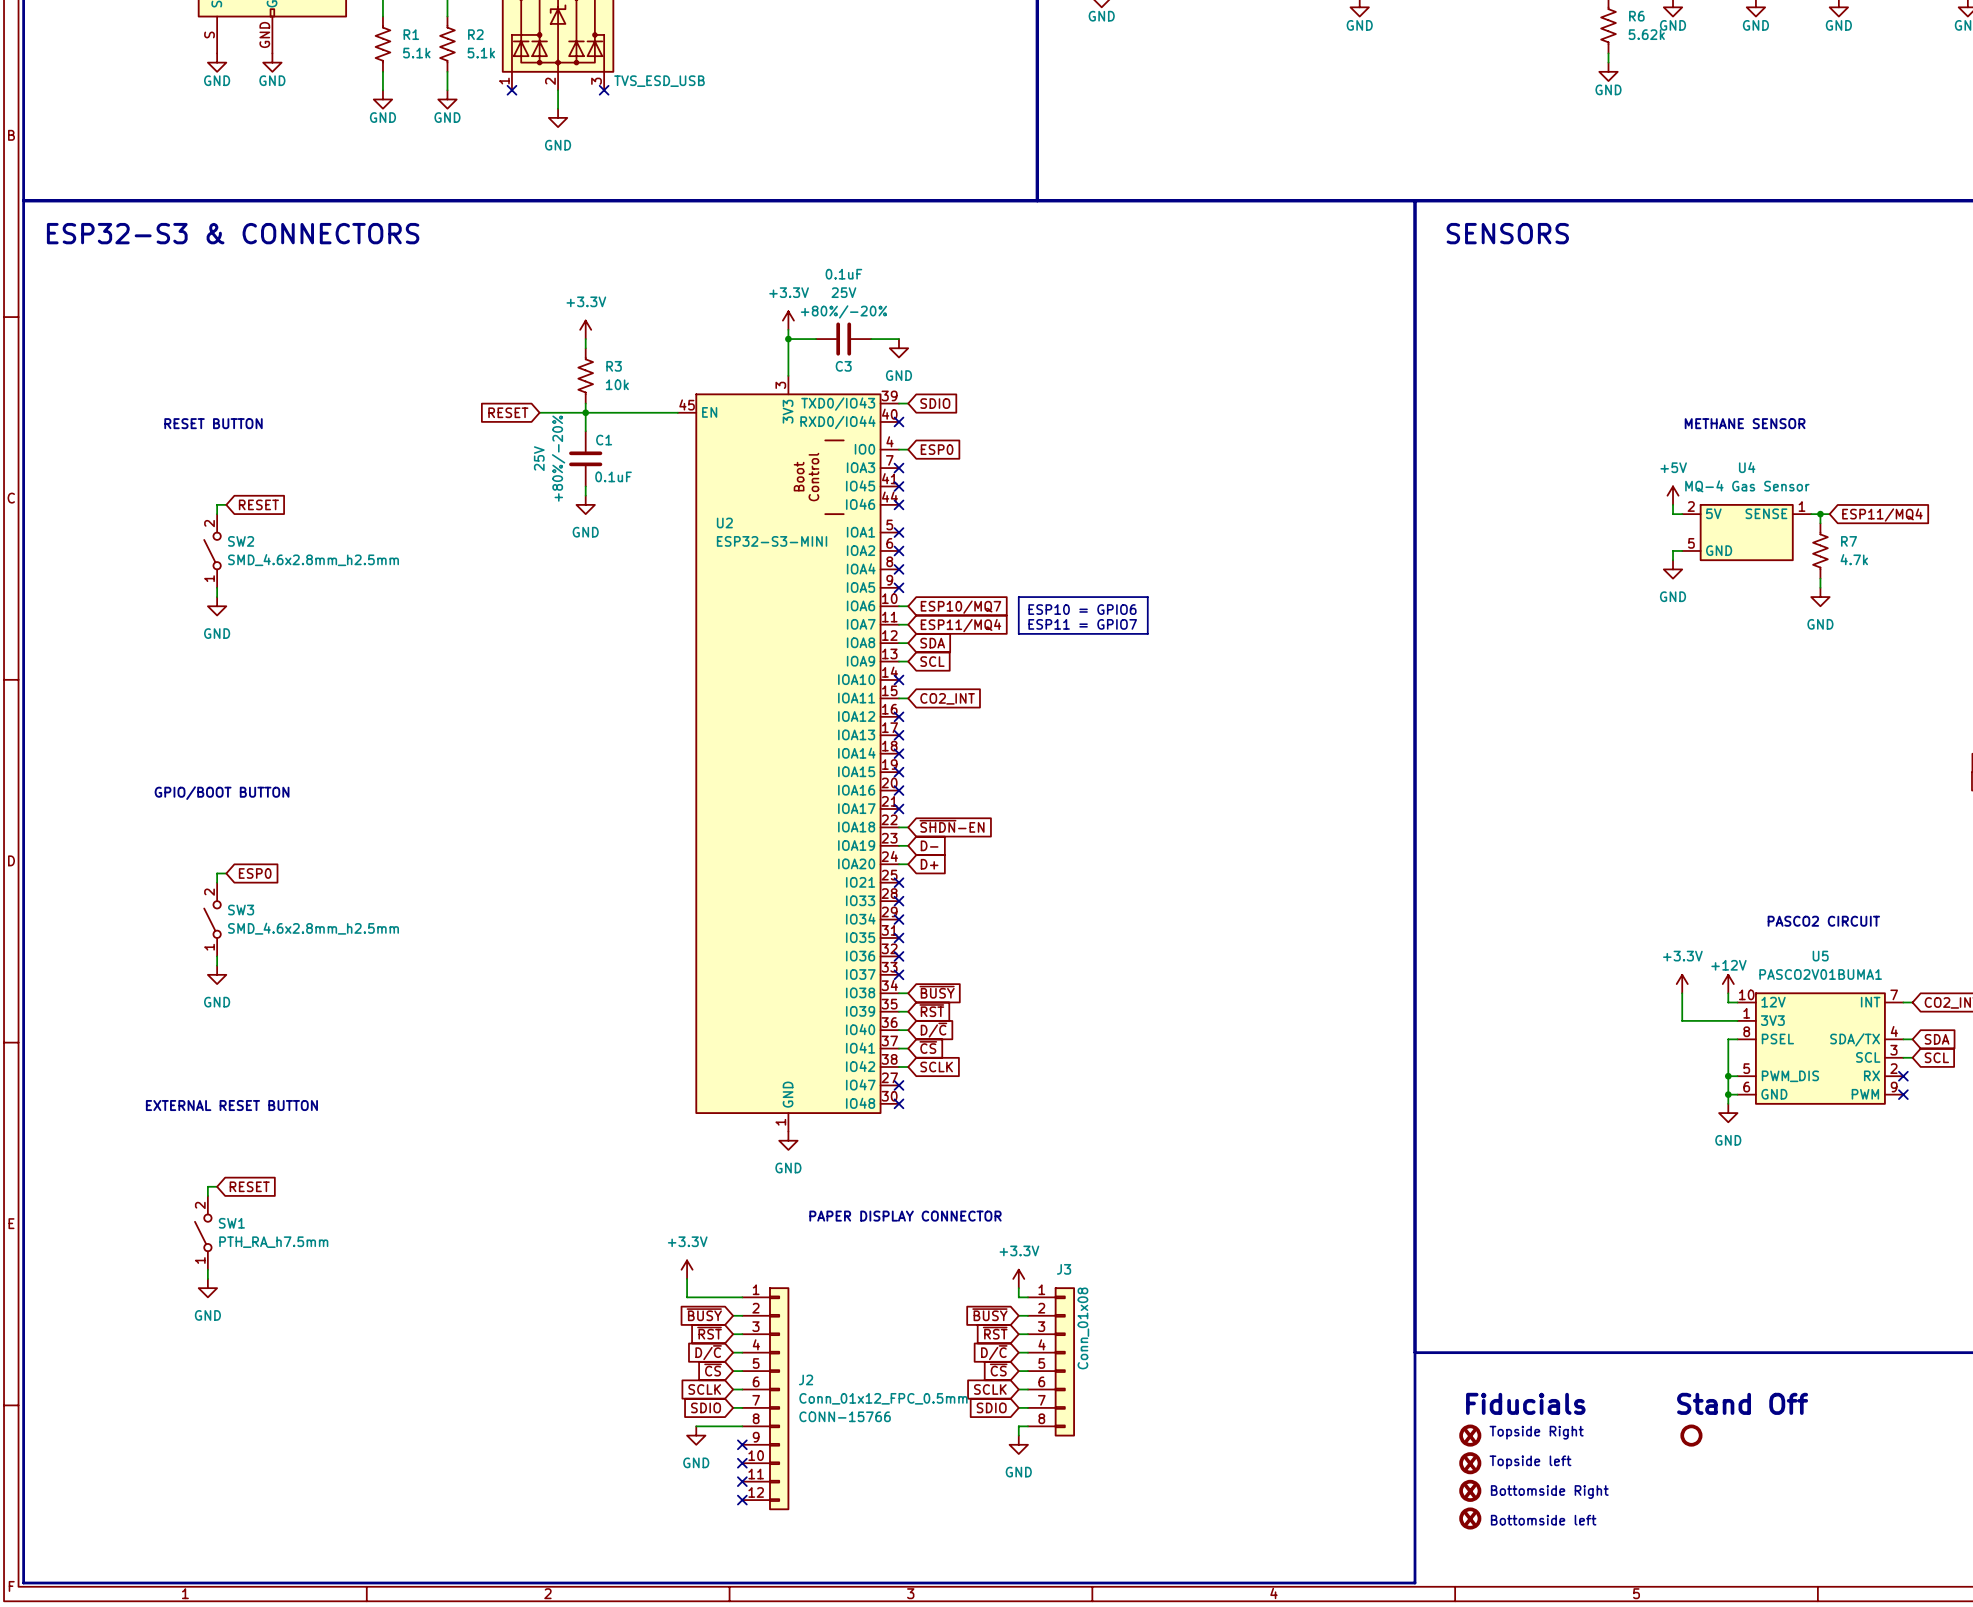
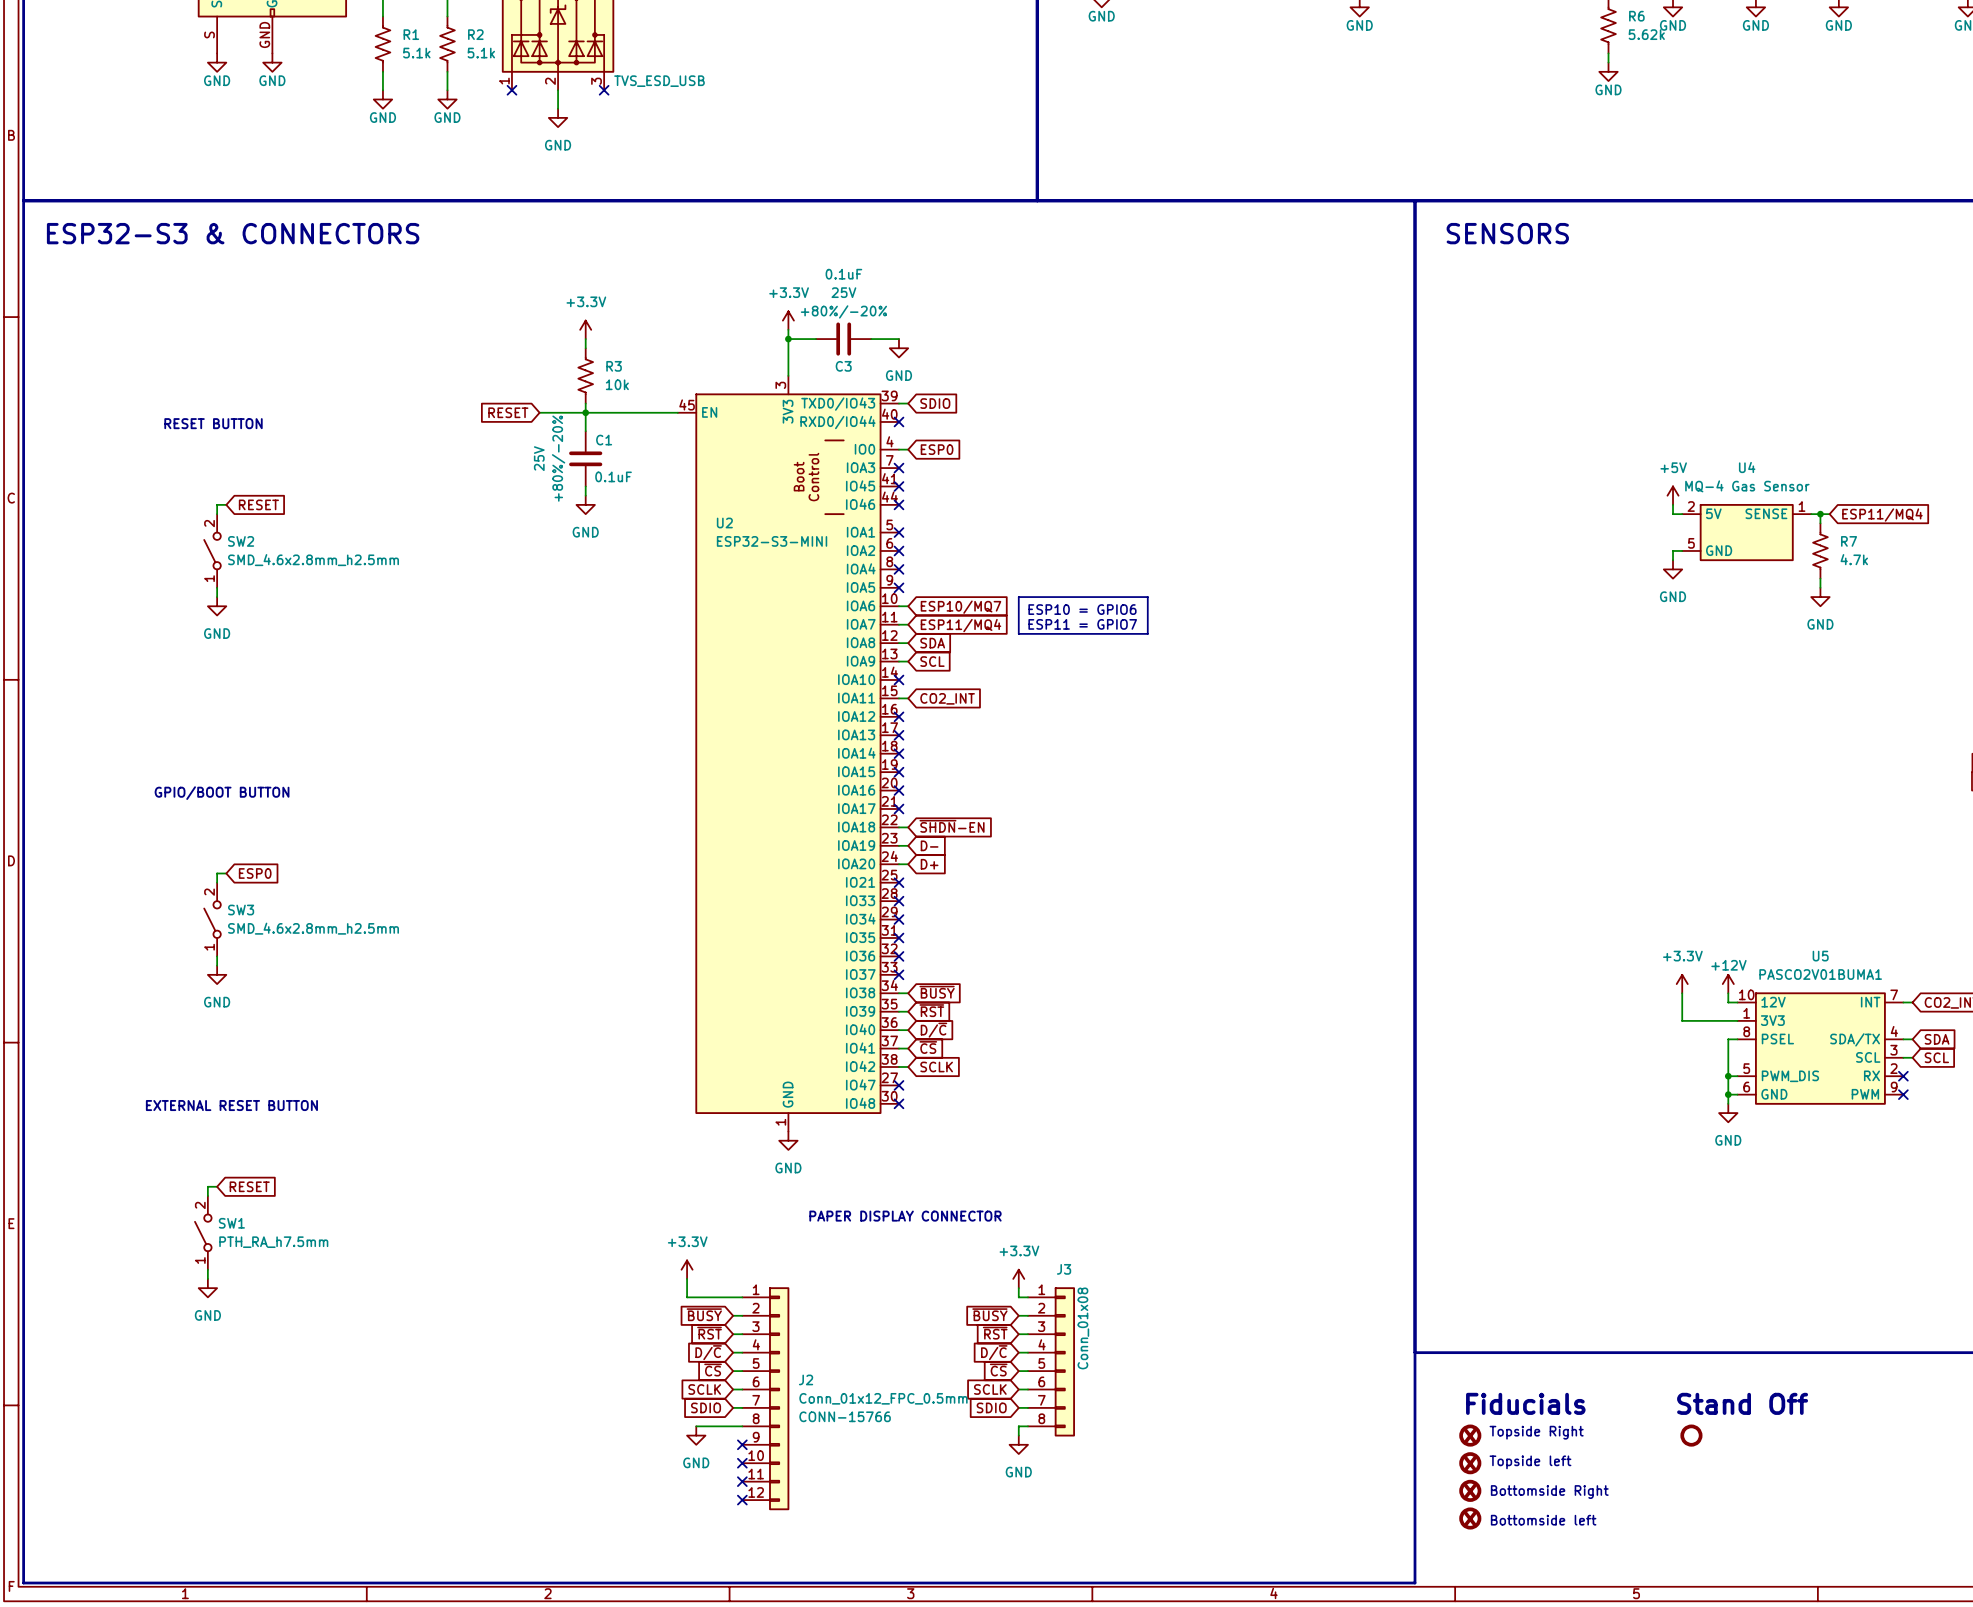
text: METHANE SENSOR (1745, 423) -> none
text: PASCO2 CIRCUIT (1823, 921) -> none

